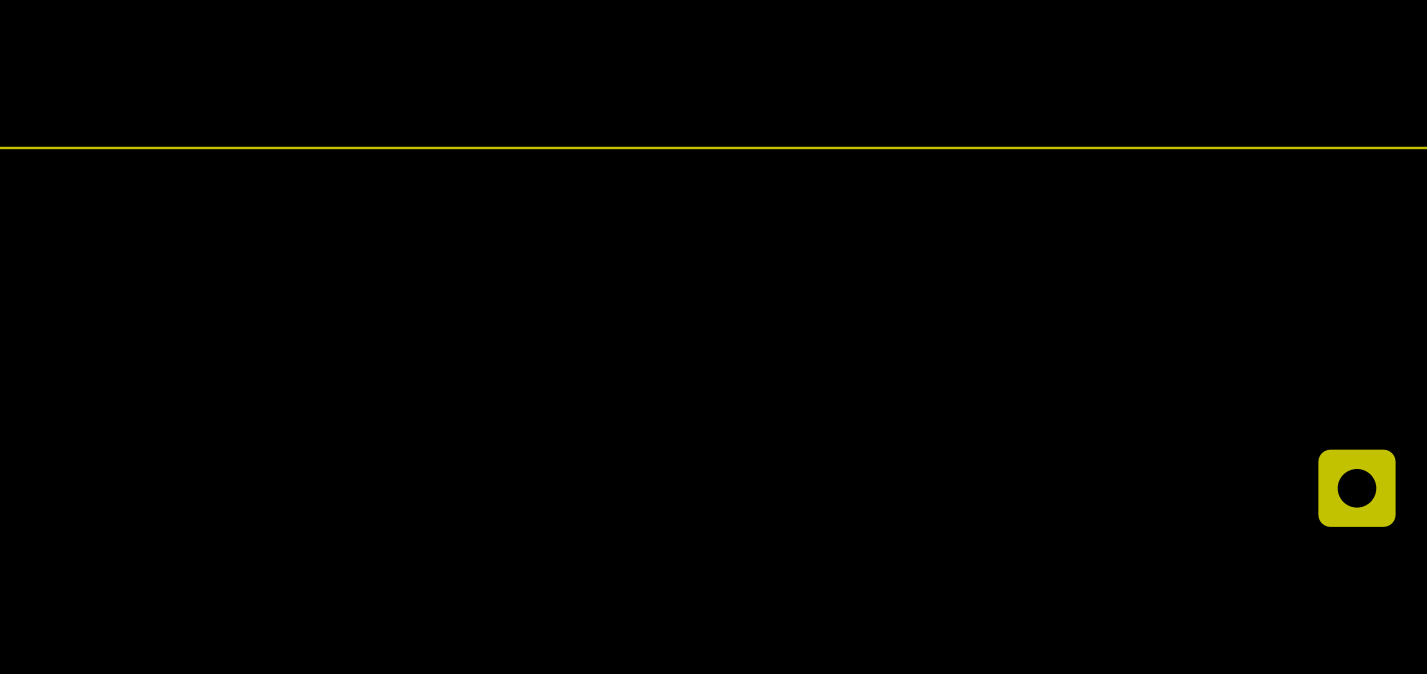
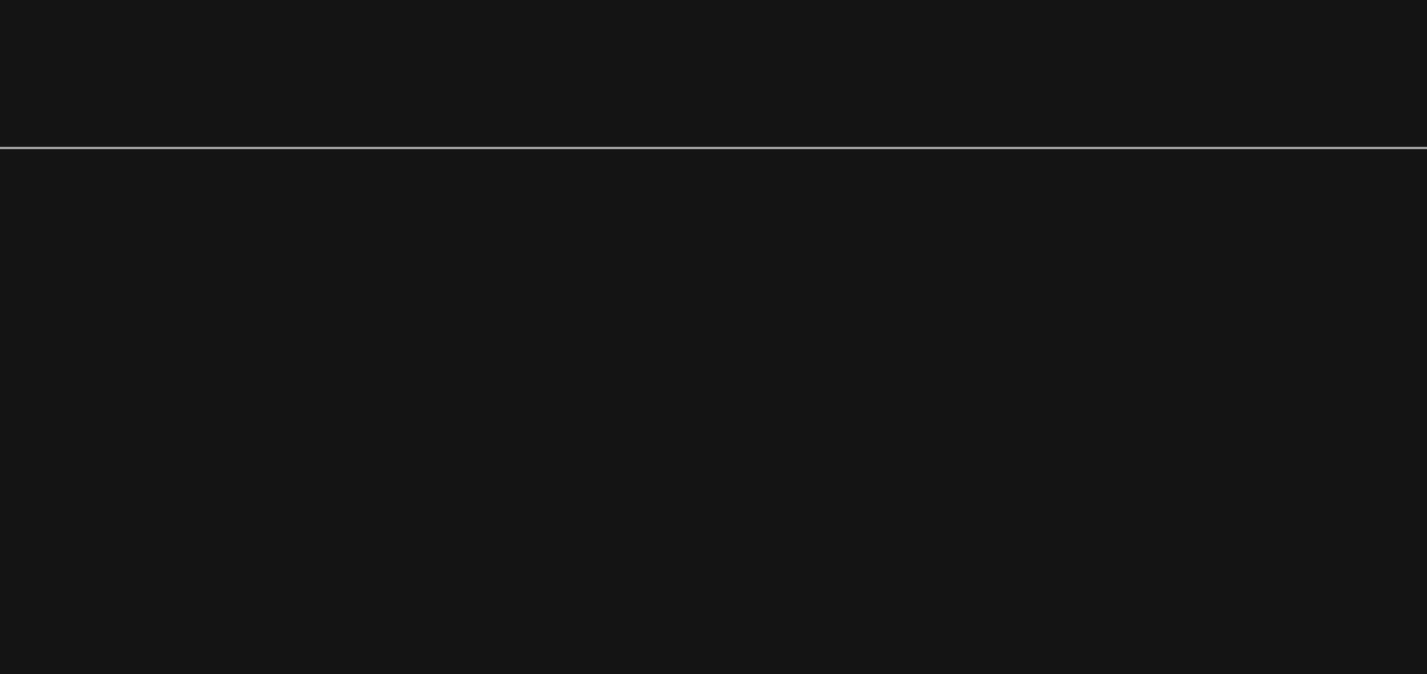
part: (1356, 488) -> none

